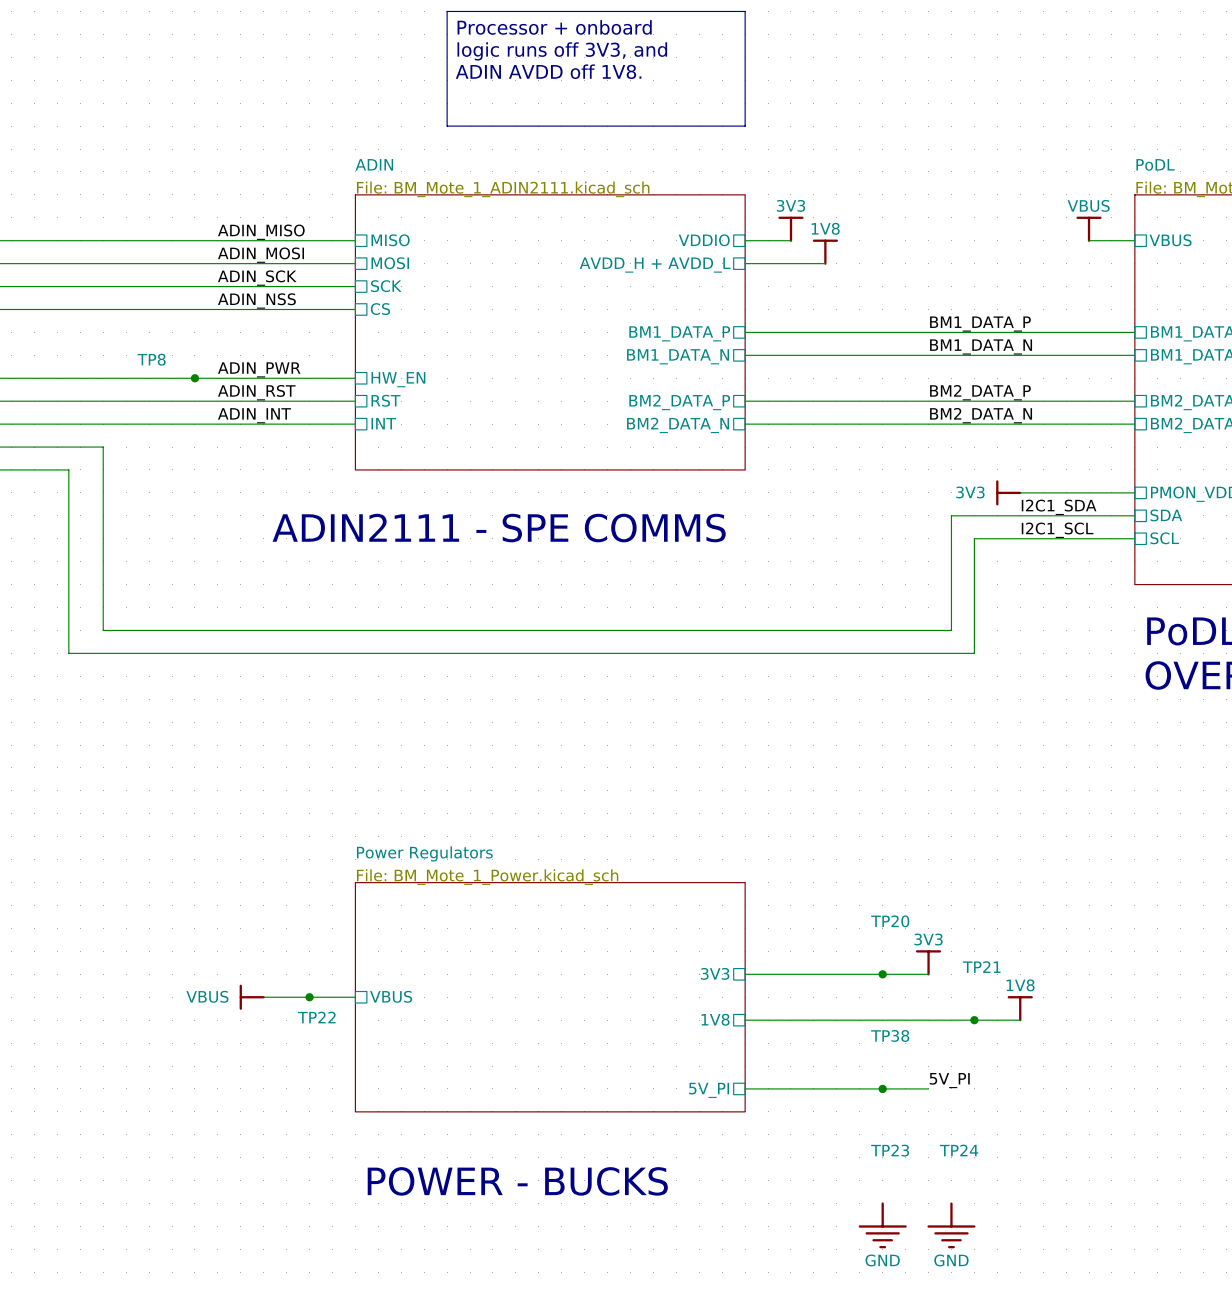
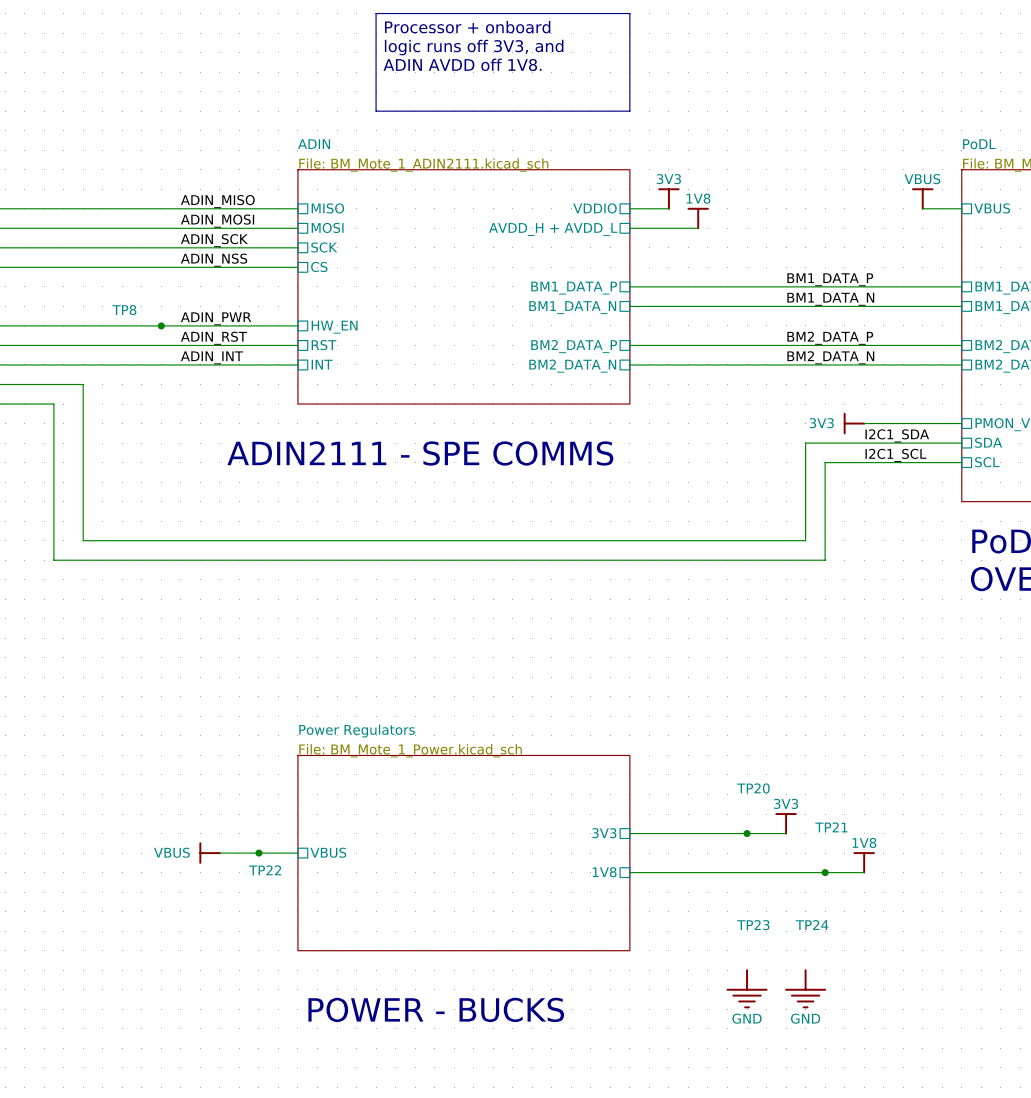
TP38: (890, 1035) -> none
label: 5V_PI (949, 1080) -> none
wire: (745, 1088) (928, 1088) -> none
junction: (882, 1088) -> none
sheet pin: 5V_PI (709, 1090) -> none
TP23 position: (890, 1150) -> (753, 925)
TP24 position: (959, 1150) -> (812, 925)
power symbol: none -> GND (747, 988)
power symbol: none -> GND (805, 988)
power symbol: GND (882, 1225) -> none
power symbol: GND (951, 1225) -> none

